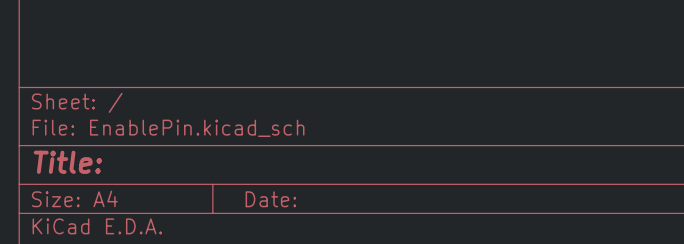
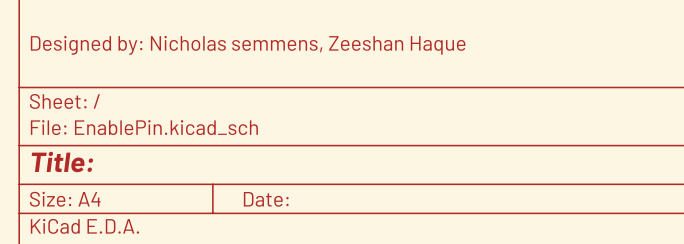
title block: none -> Designed by: Nicholas semmens, Zeeshan Haque (248, 45)

